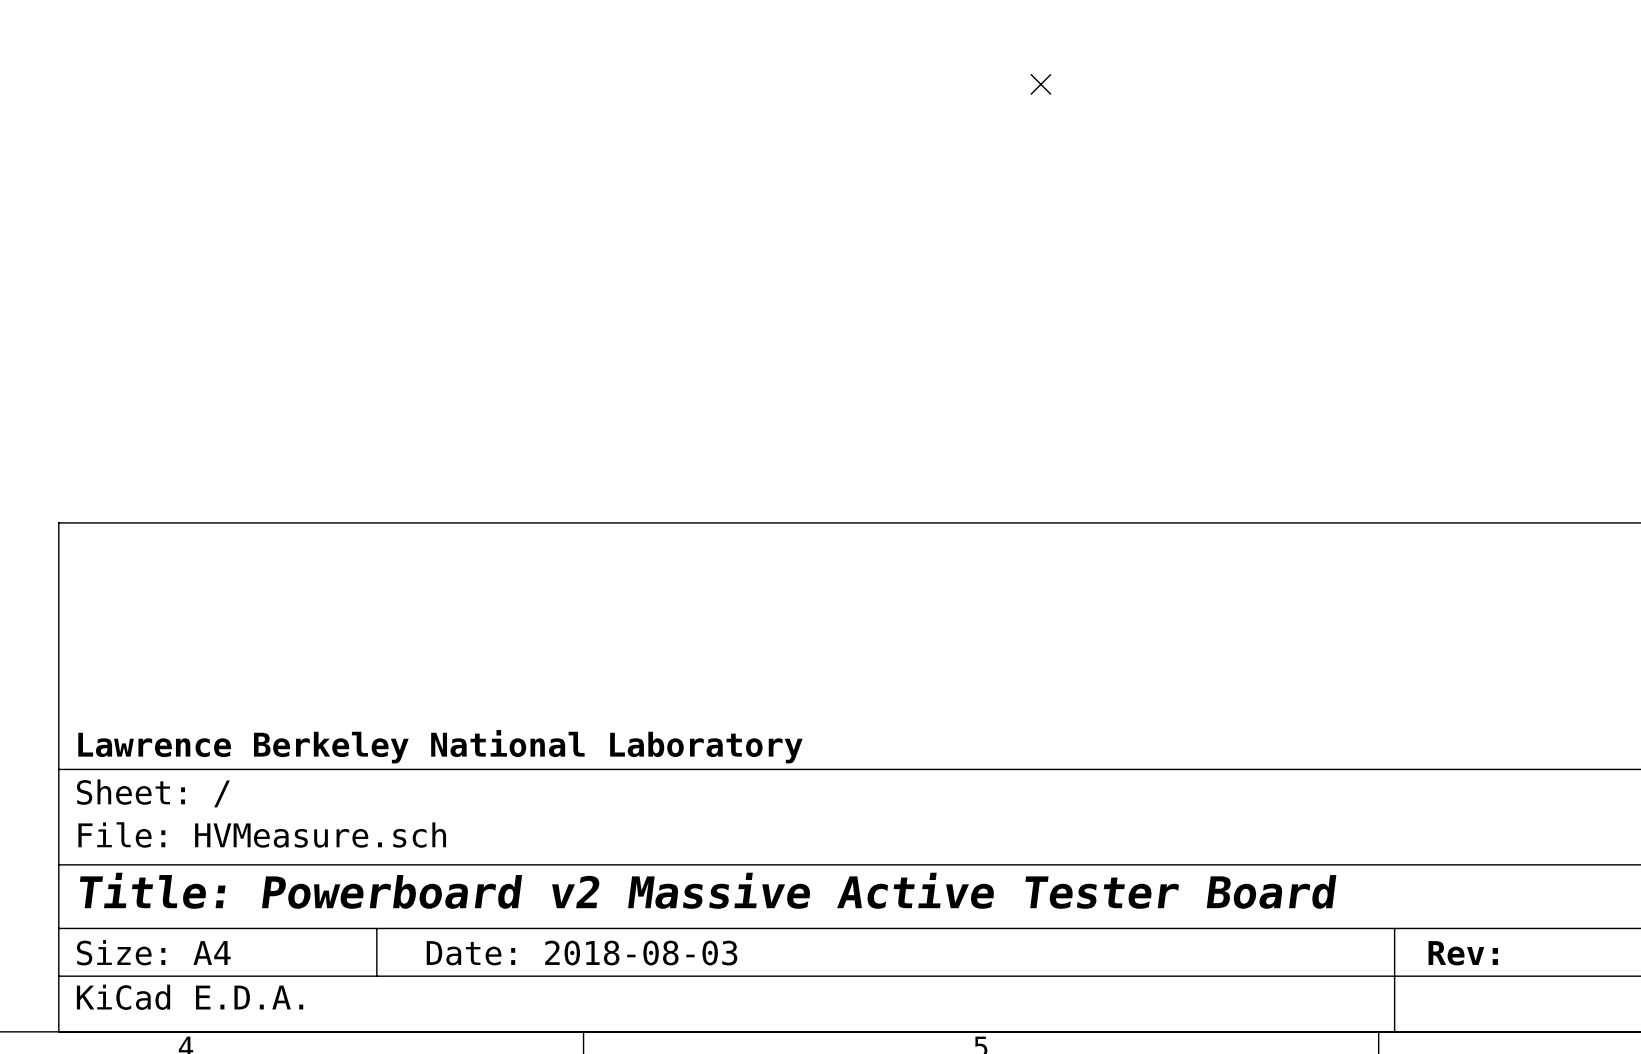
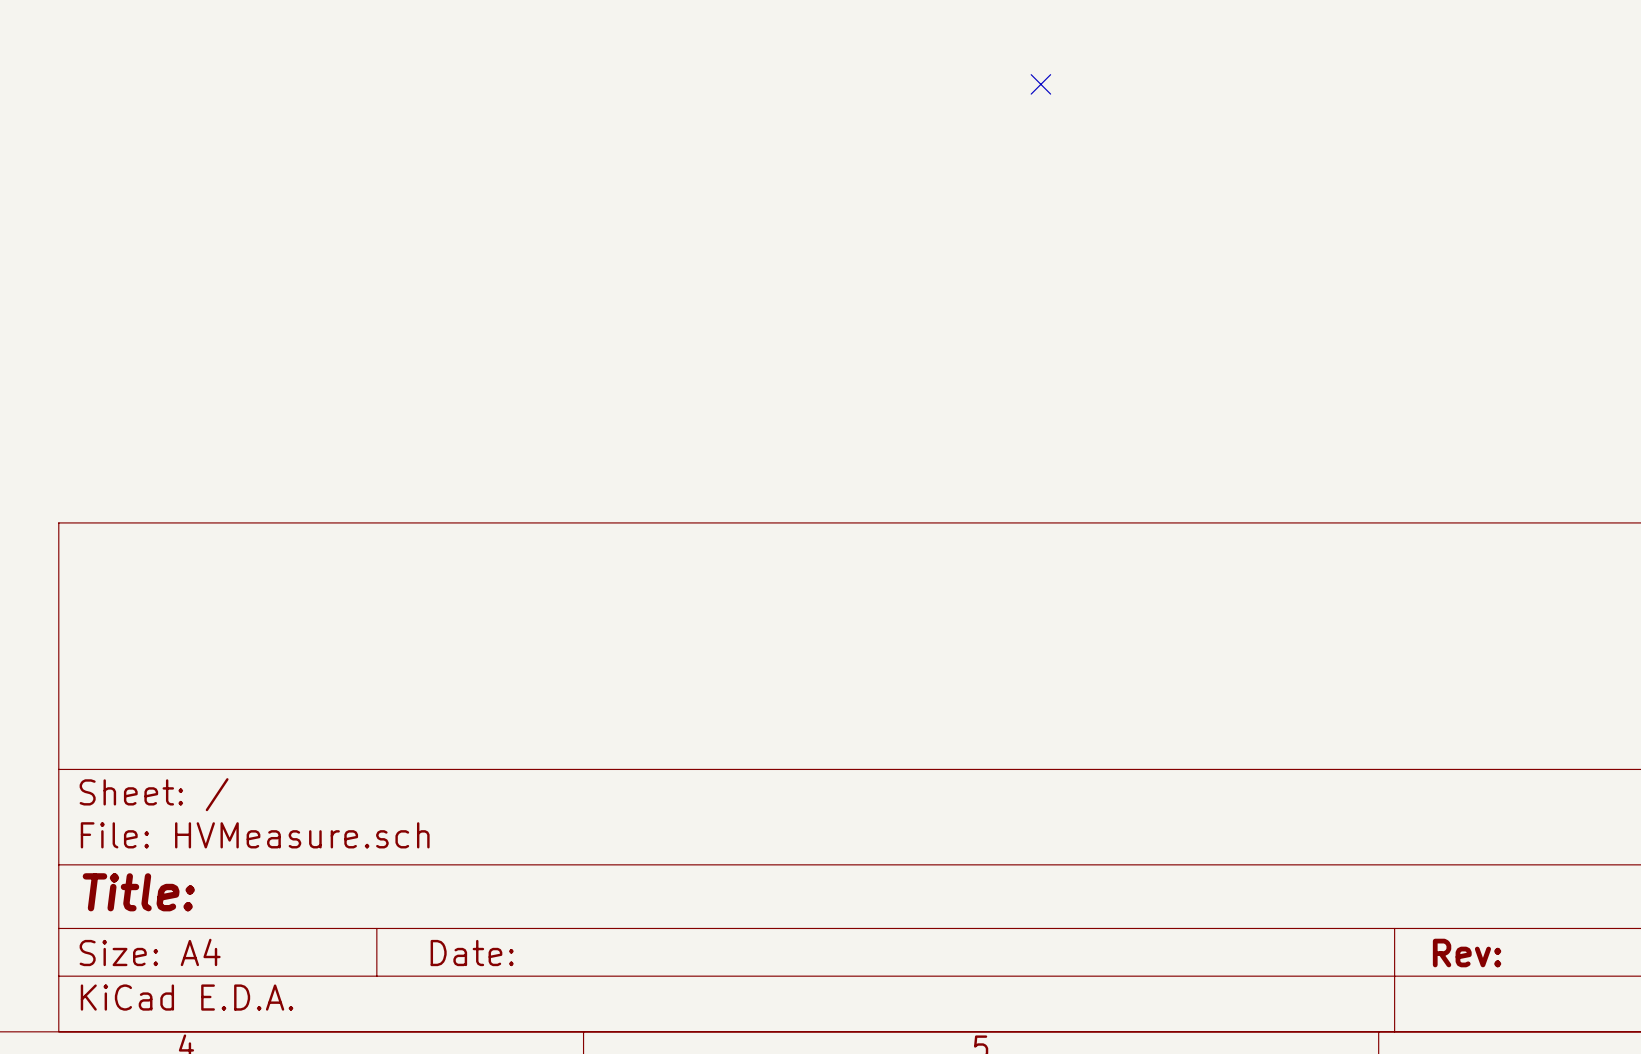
title block: Lawrence Berkeley National Laboratory (440, 746) -> none
title block: Title: Powerboard v2 Massive Active Tester Board (708, 890) -> Title: (138, 892)
title block: Date: 2018-08-03 (582, 953) -> Date: (472, 953)

